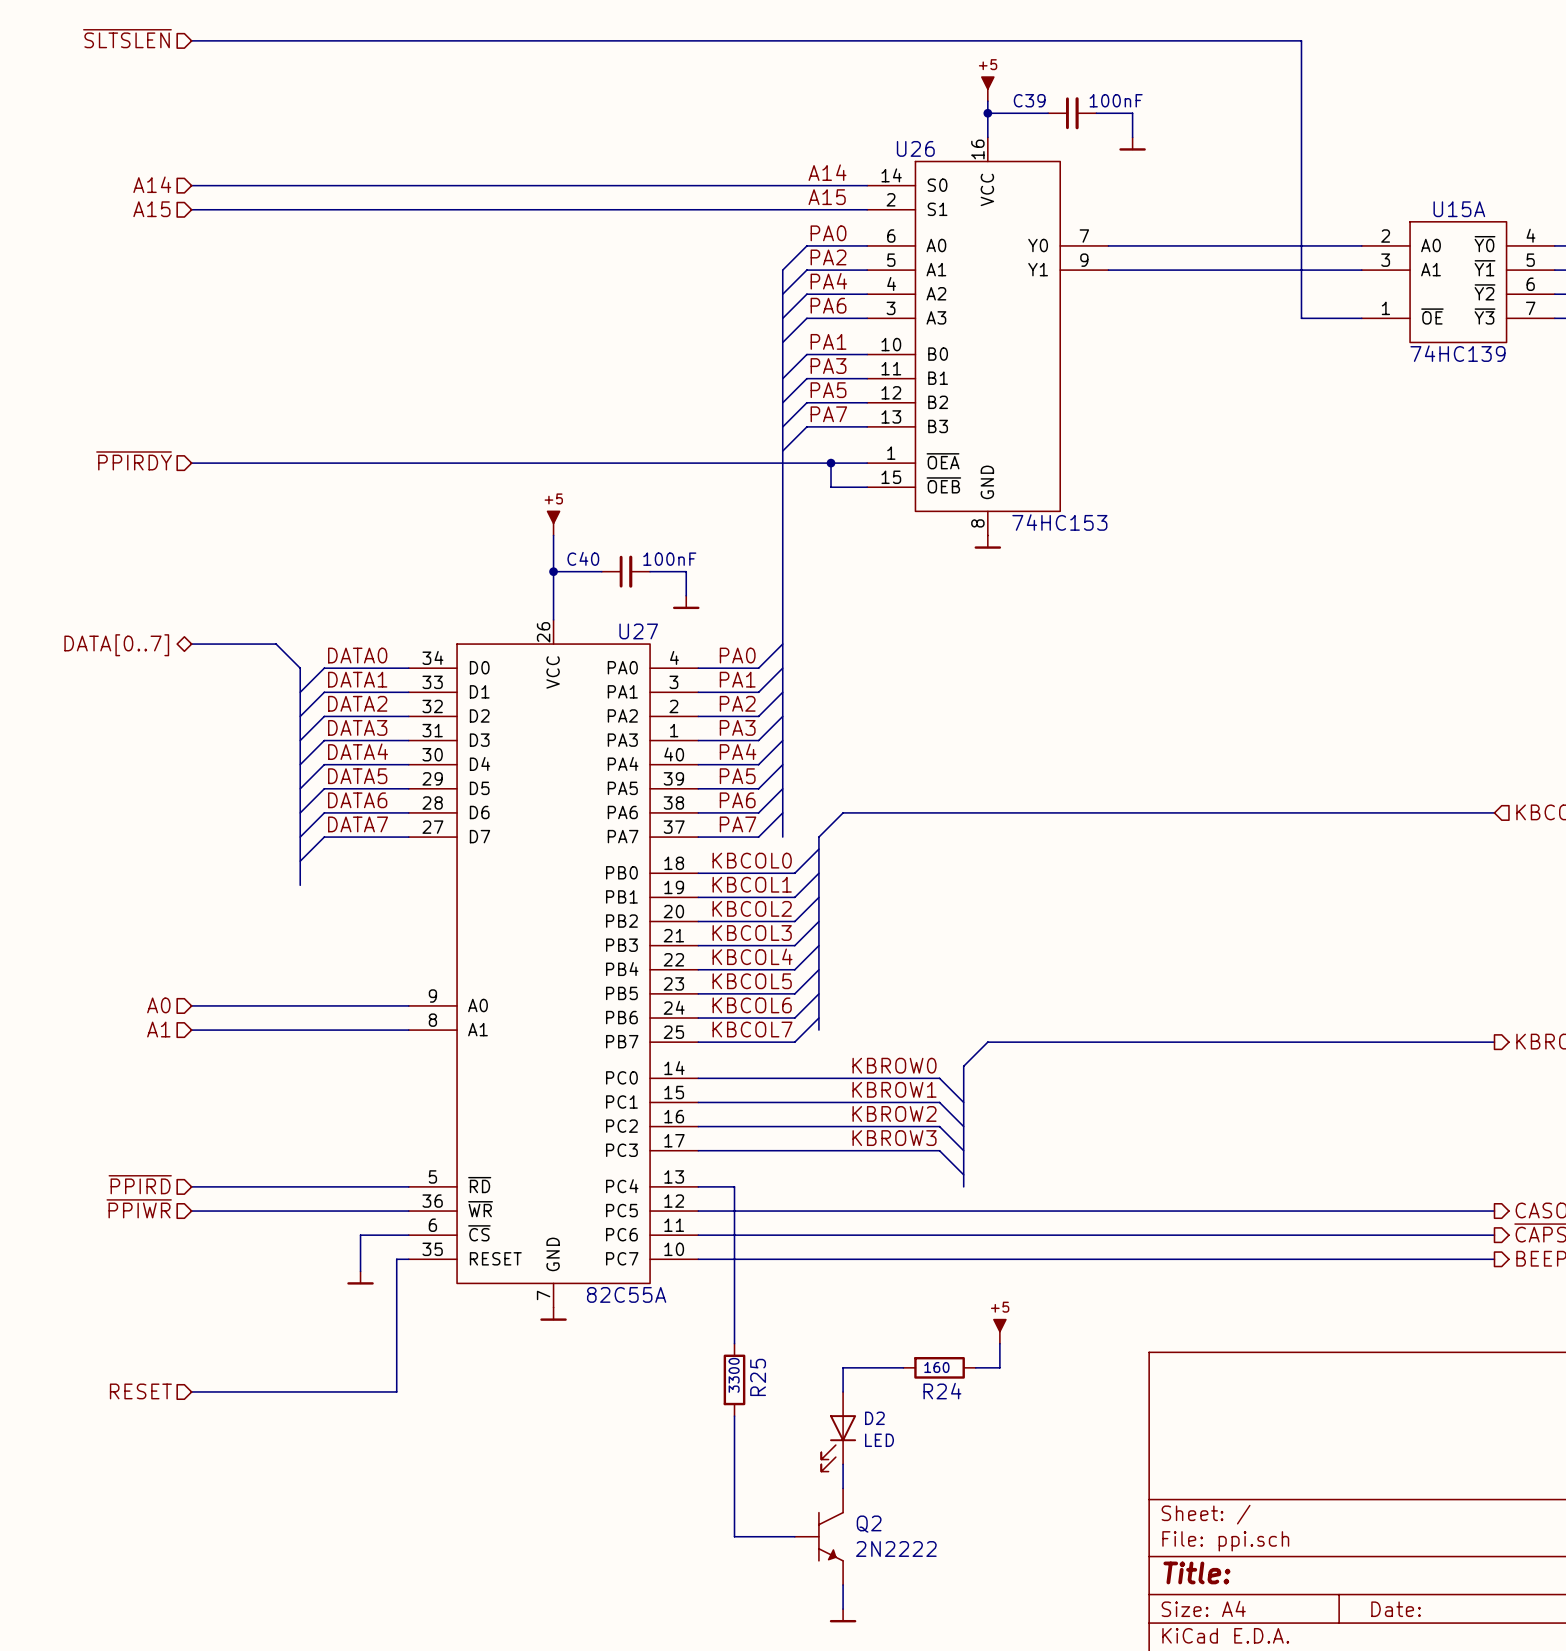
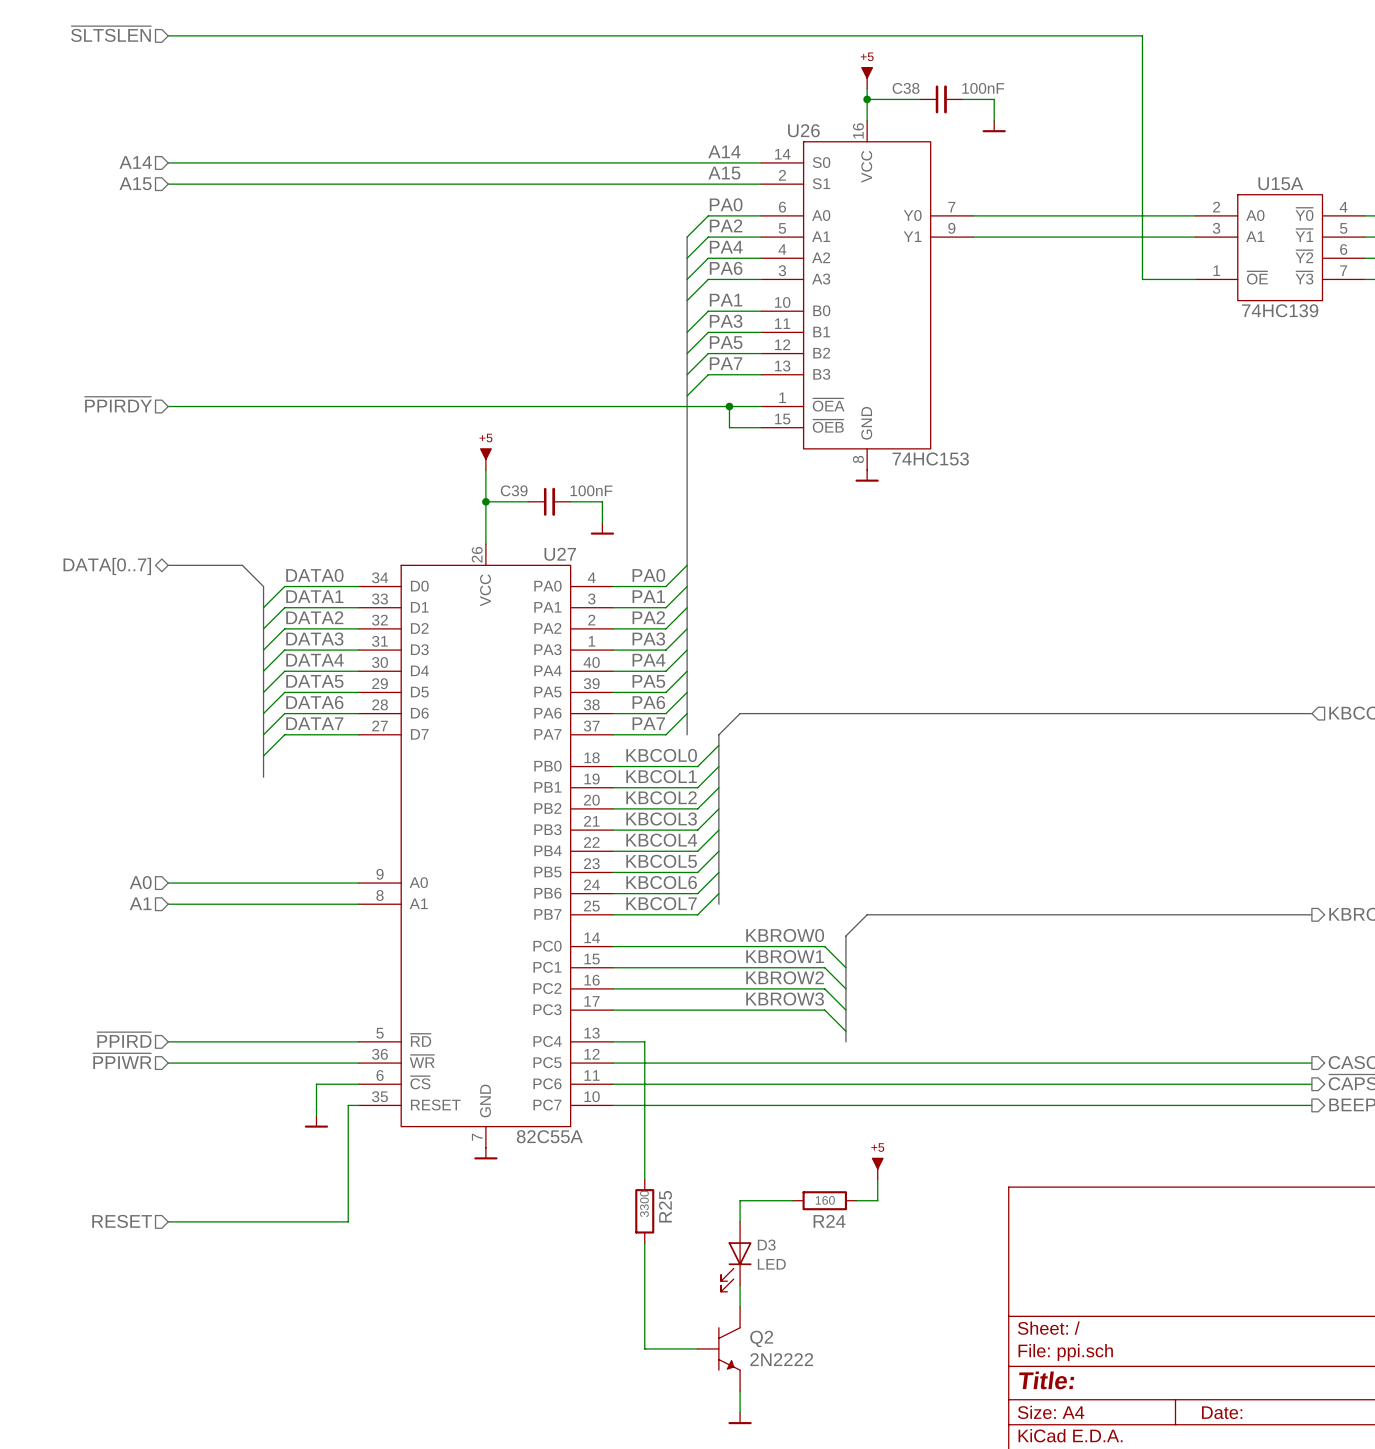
C39 name: C39 (1029, 100) -> C38 (906, 88)
C40 name: C40 (583, 558) -> C39 (514, 490)
D2 name: D2 (874, 1418) -> D3 (766, 1245)

